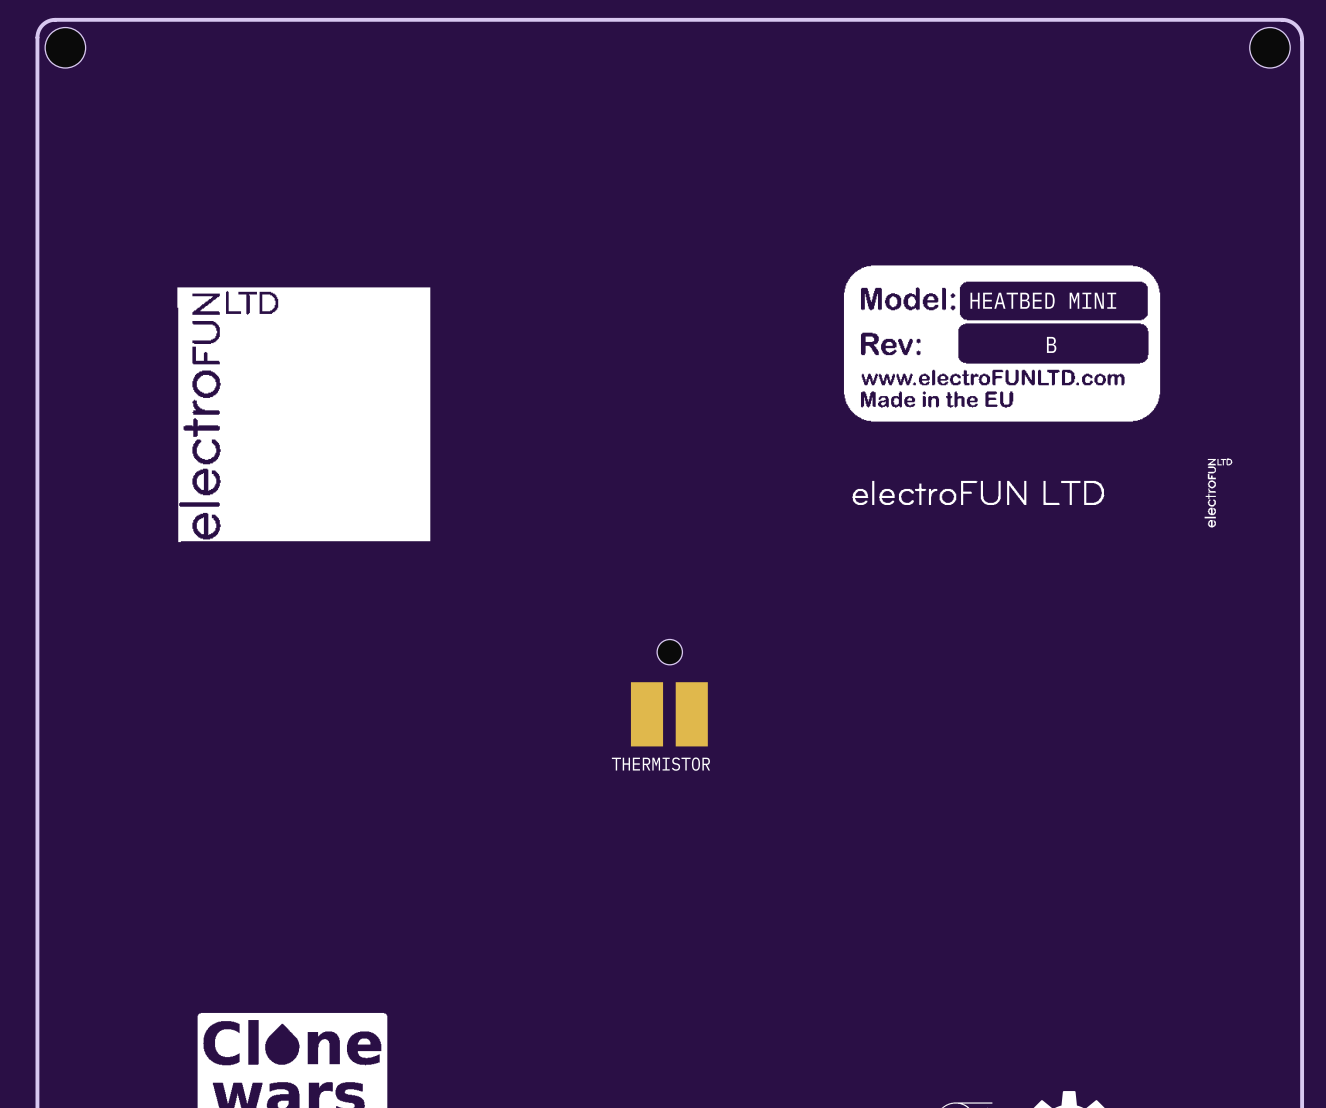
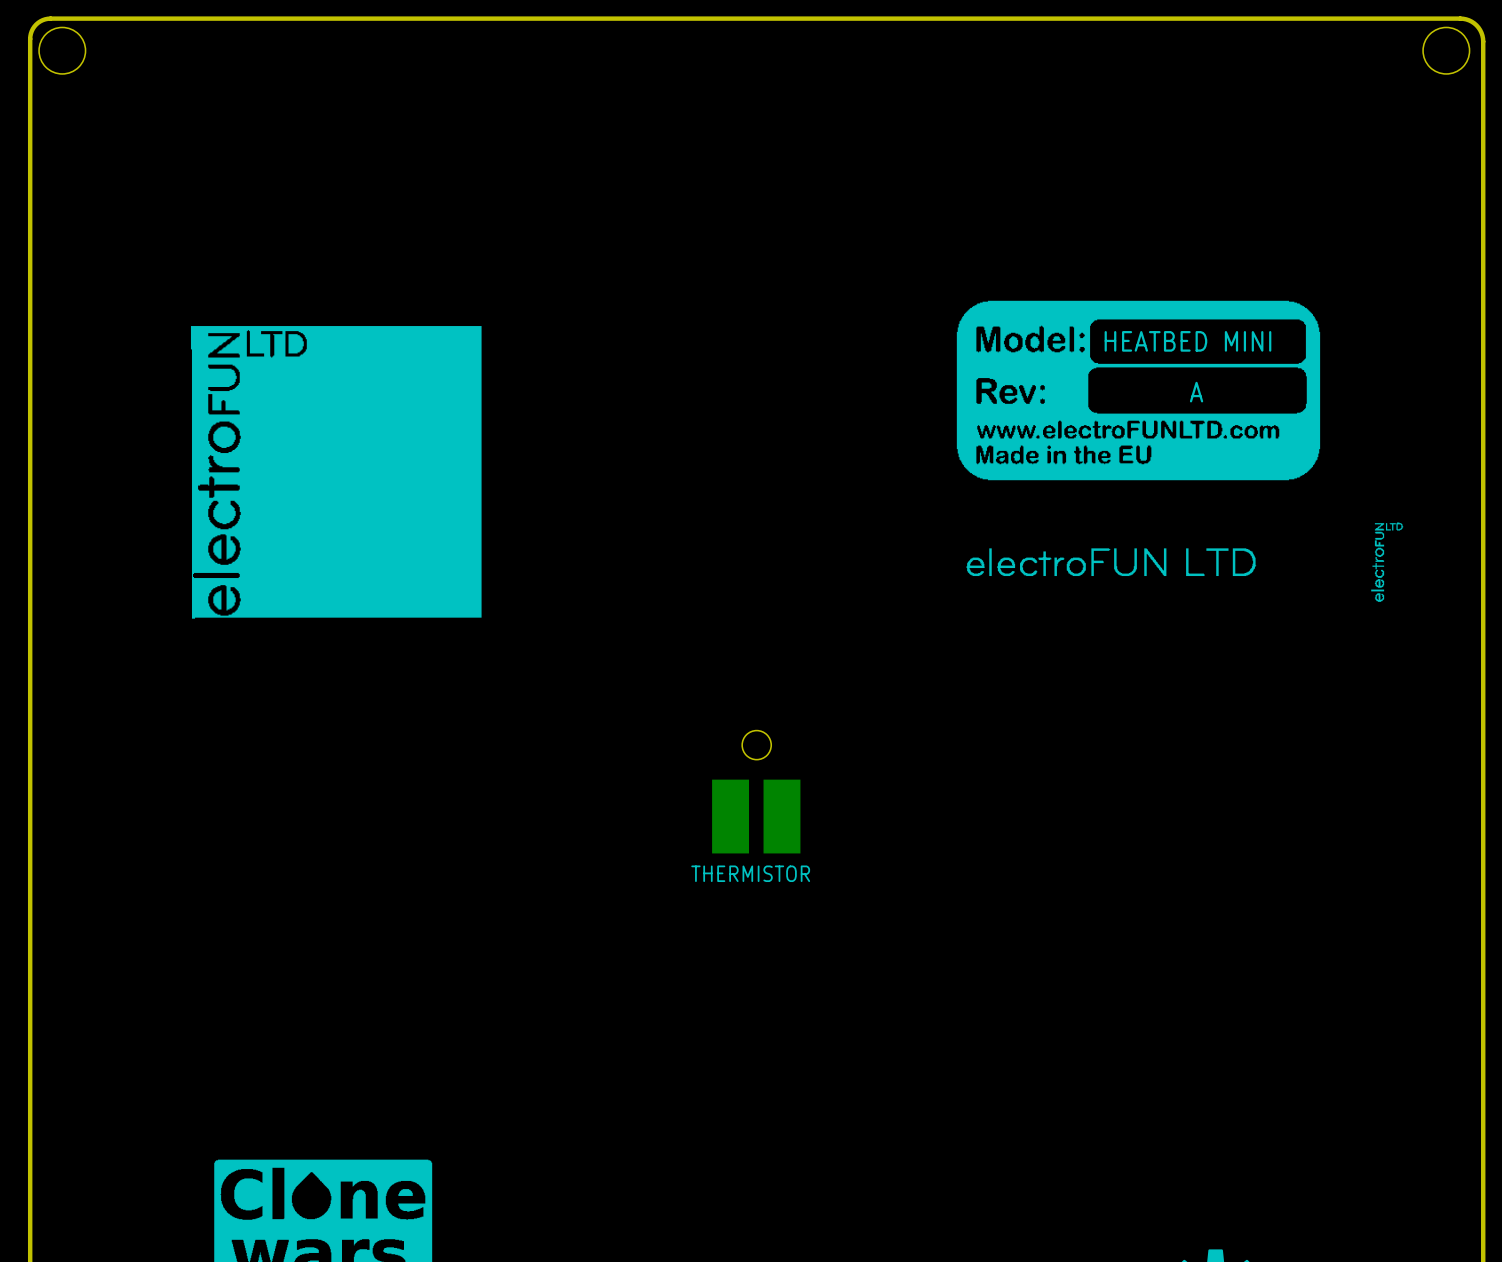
text: B (1051, 344) -> A (1196, 392)

